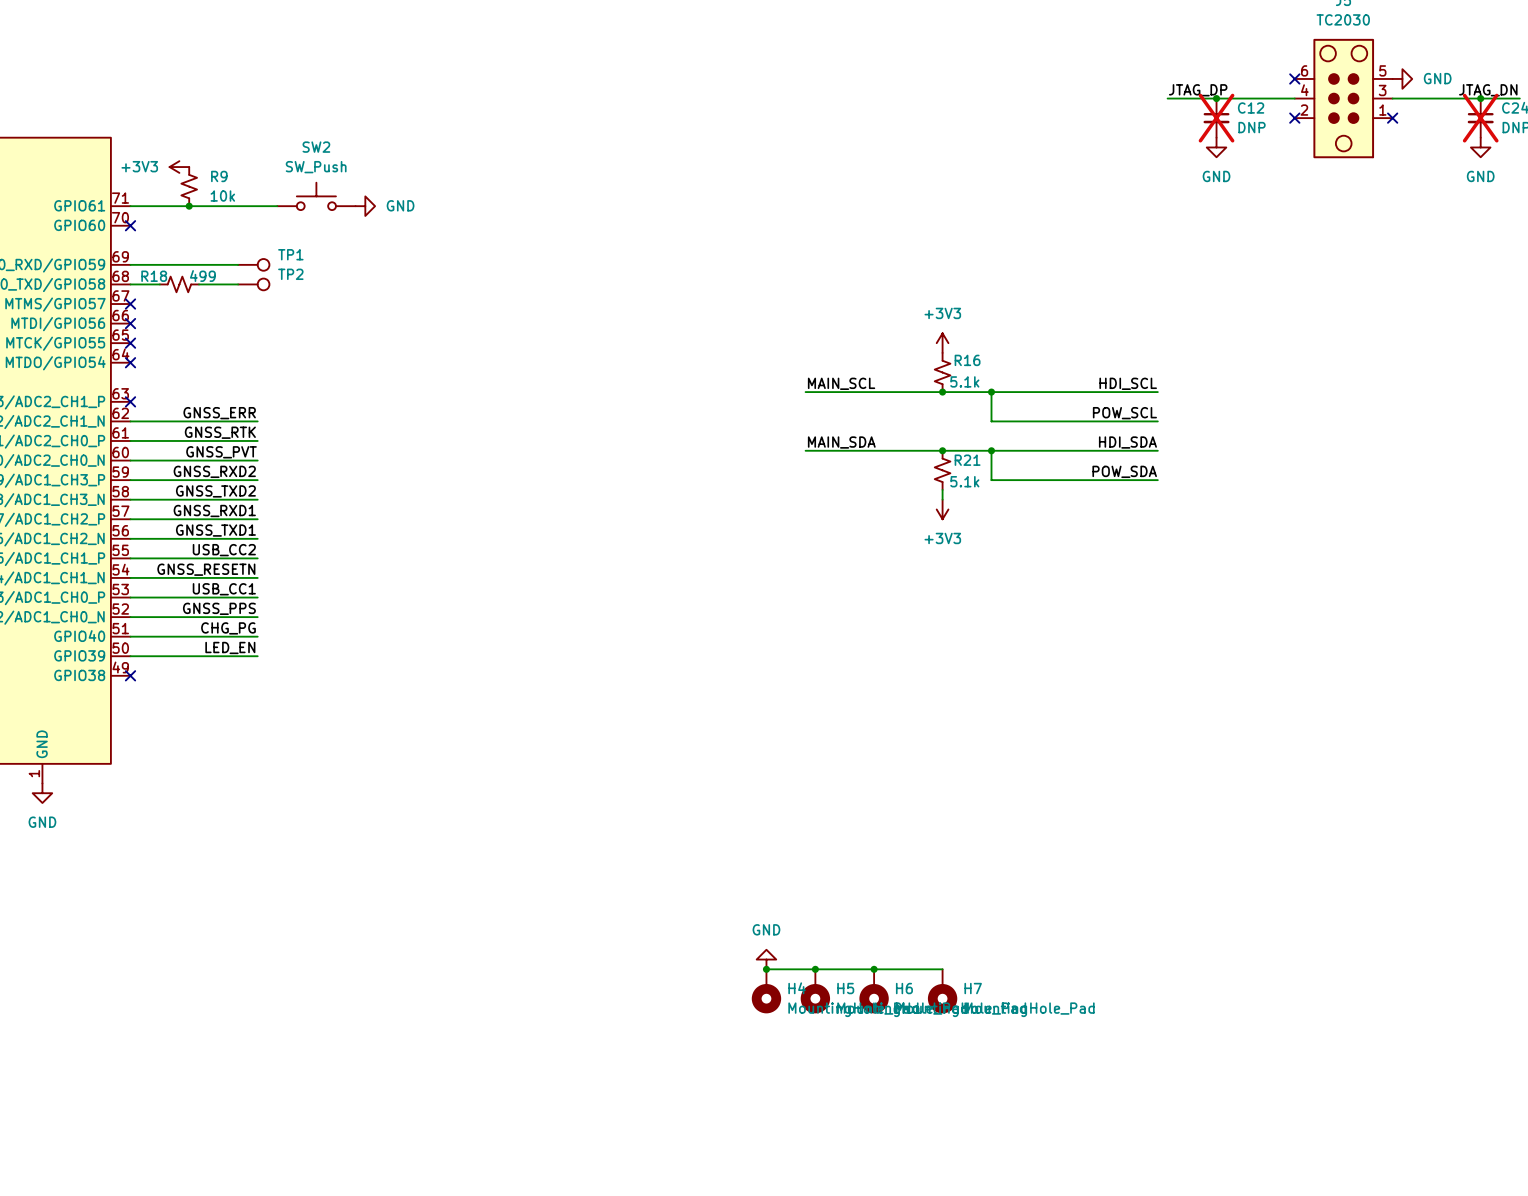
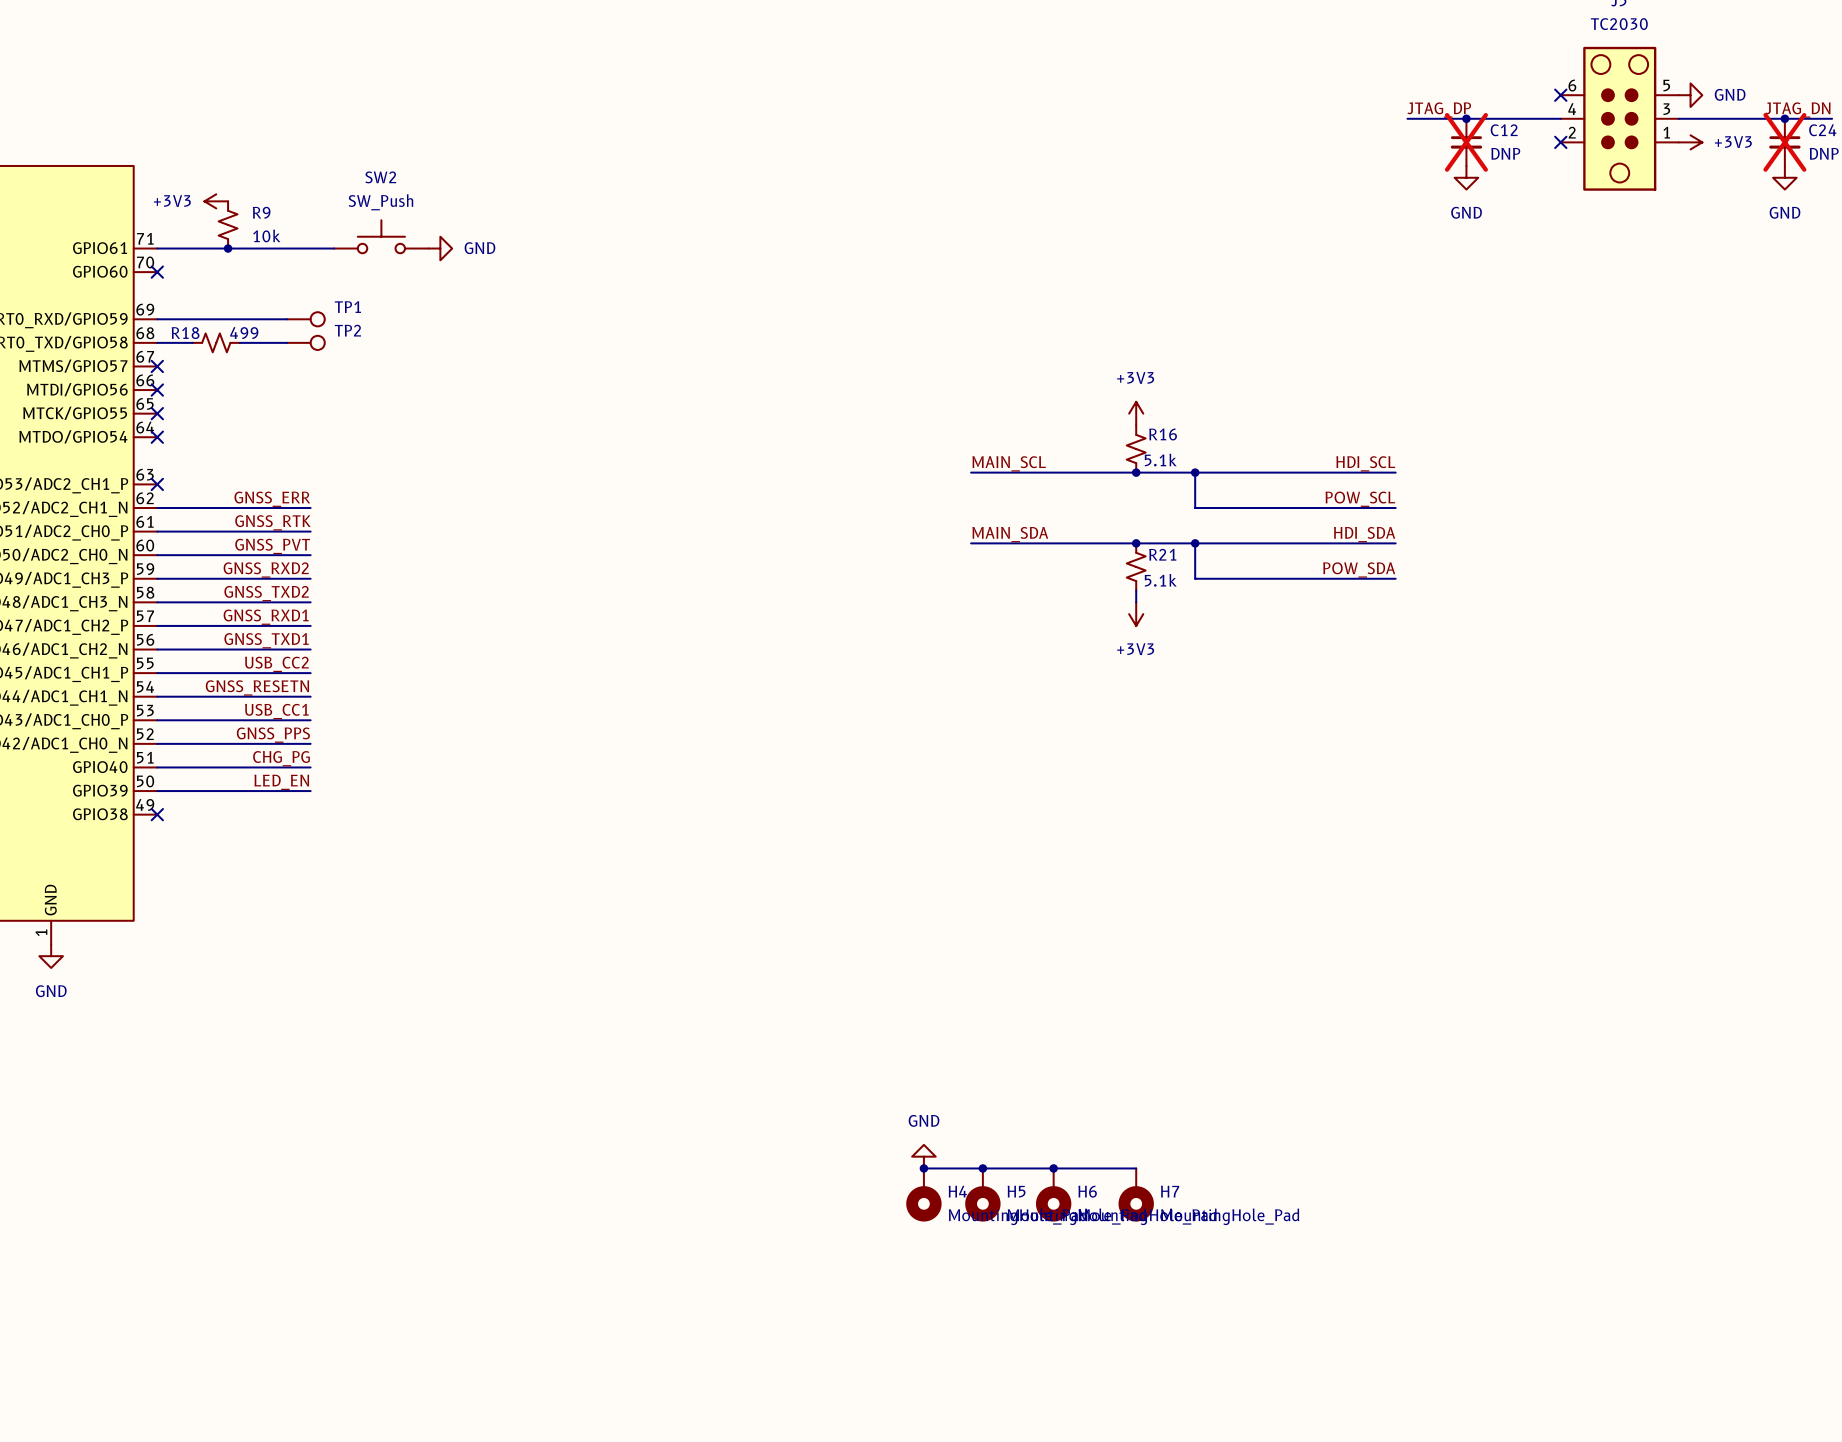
no-connect mark: (1392, 118) -> none
power symbol: none -> +3V3 (1690, 142)

